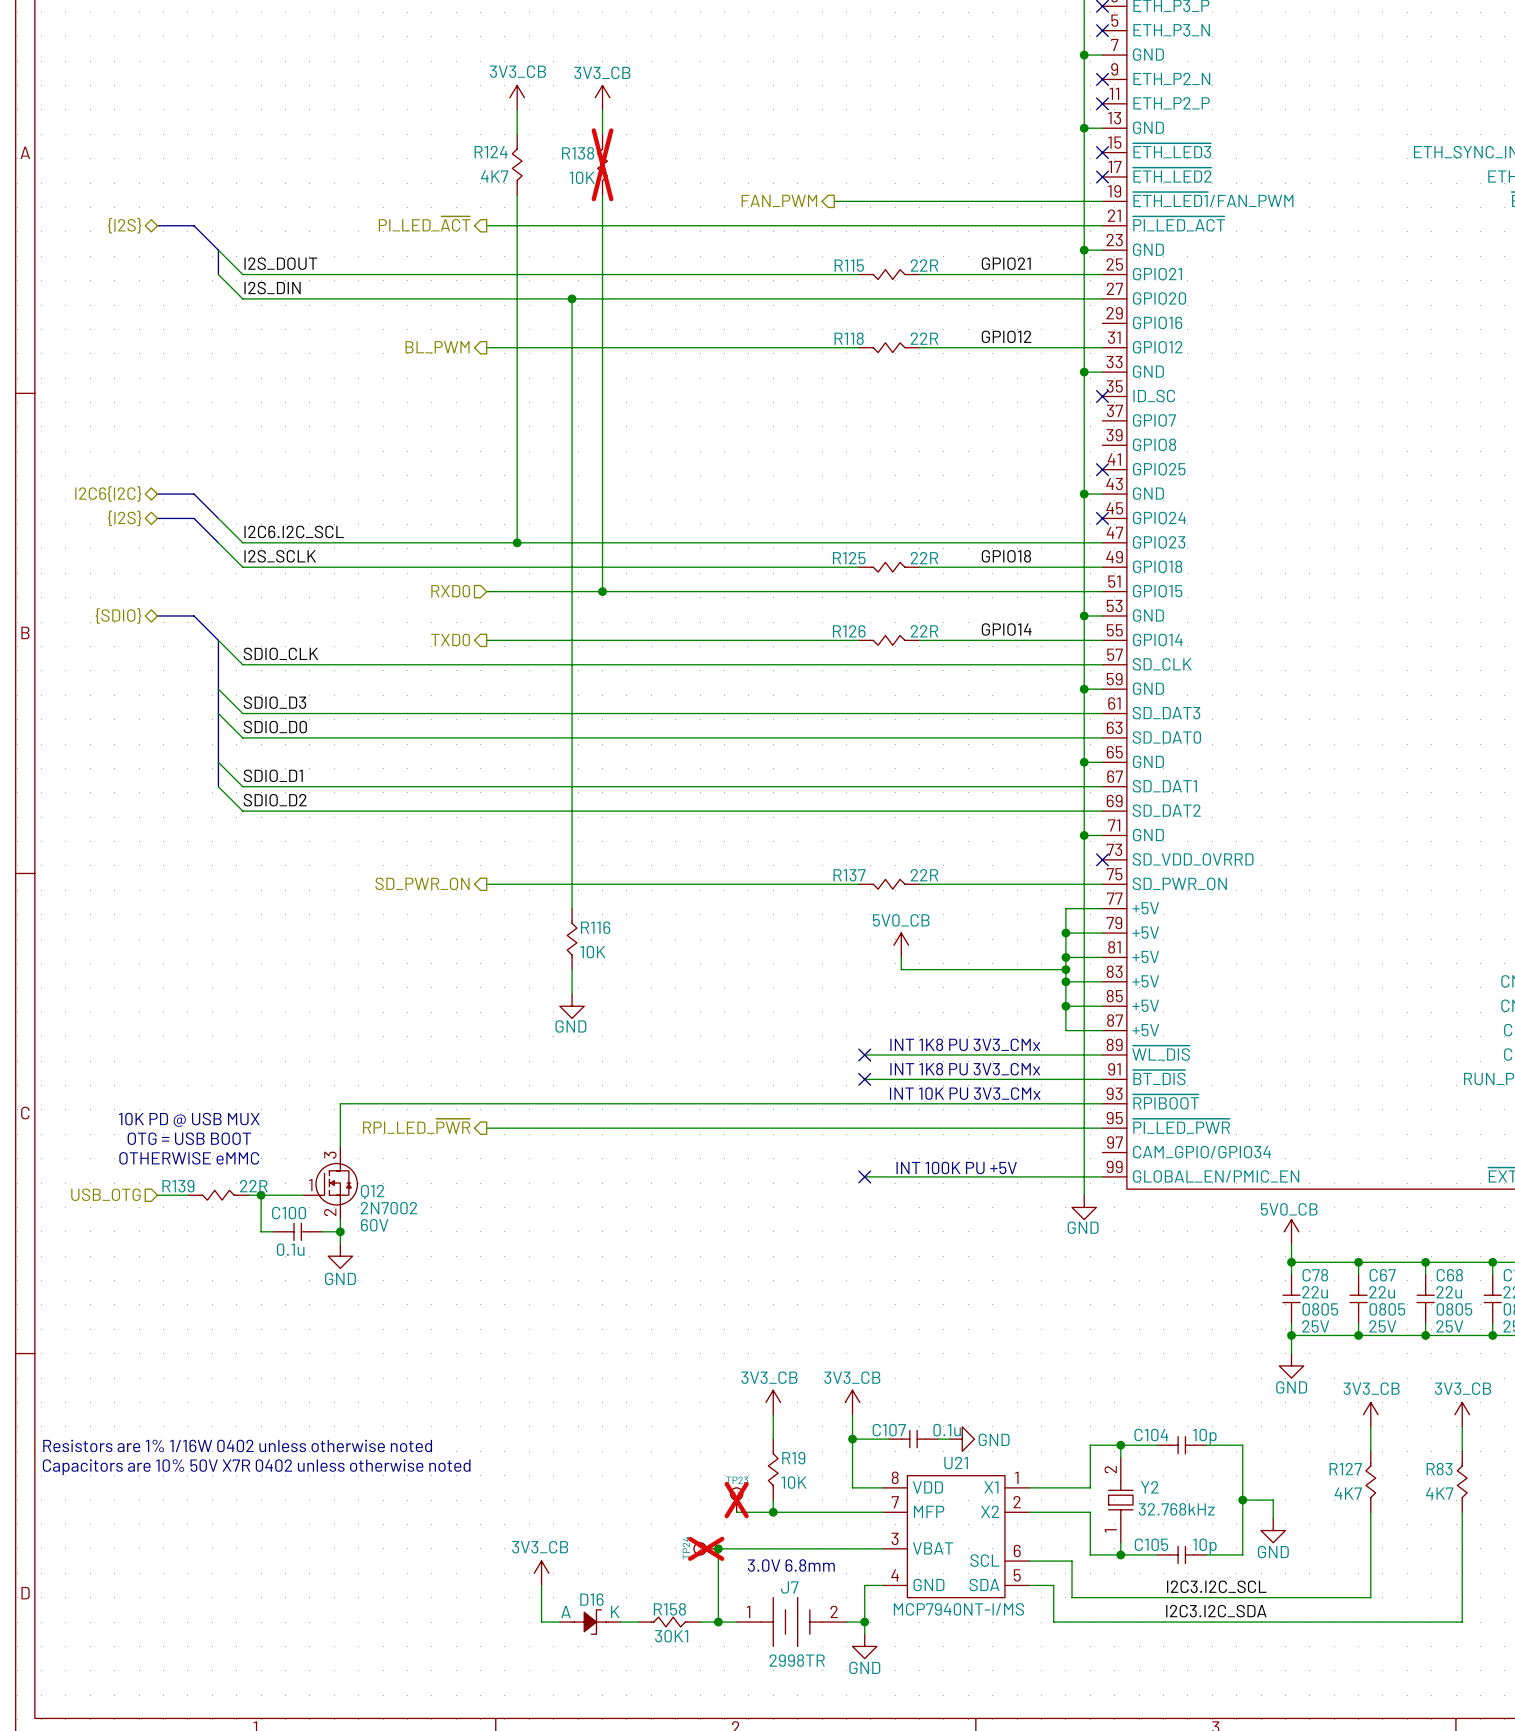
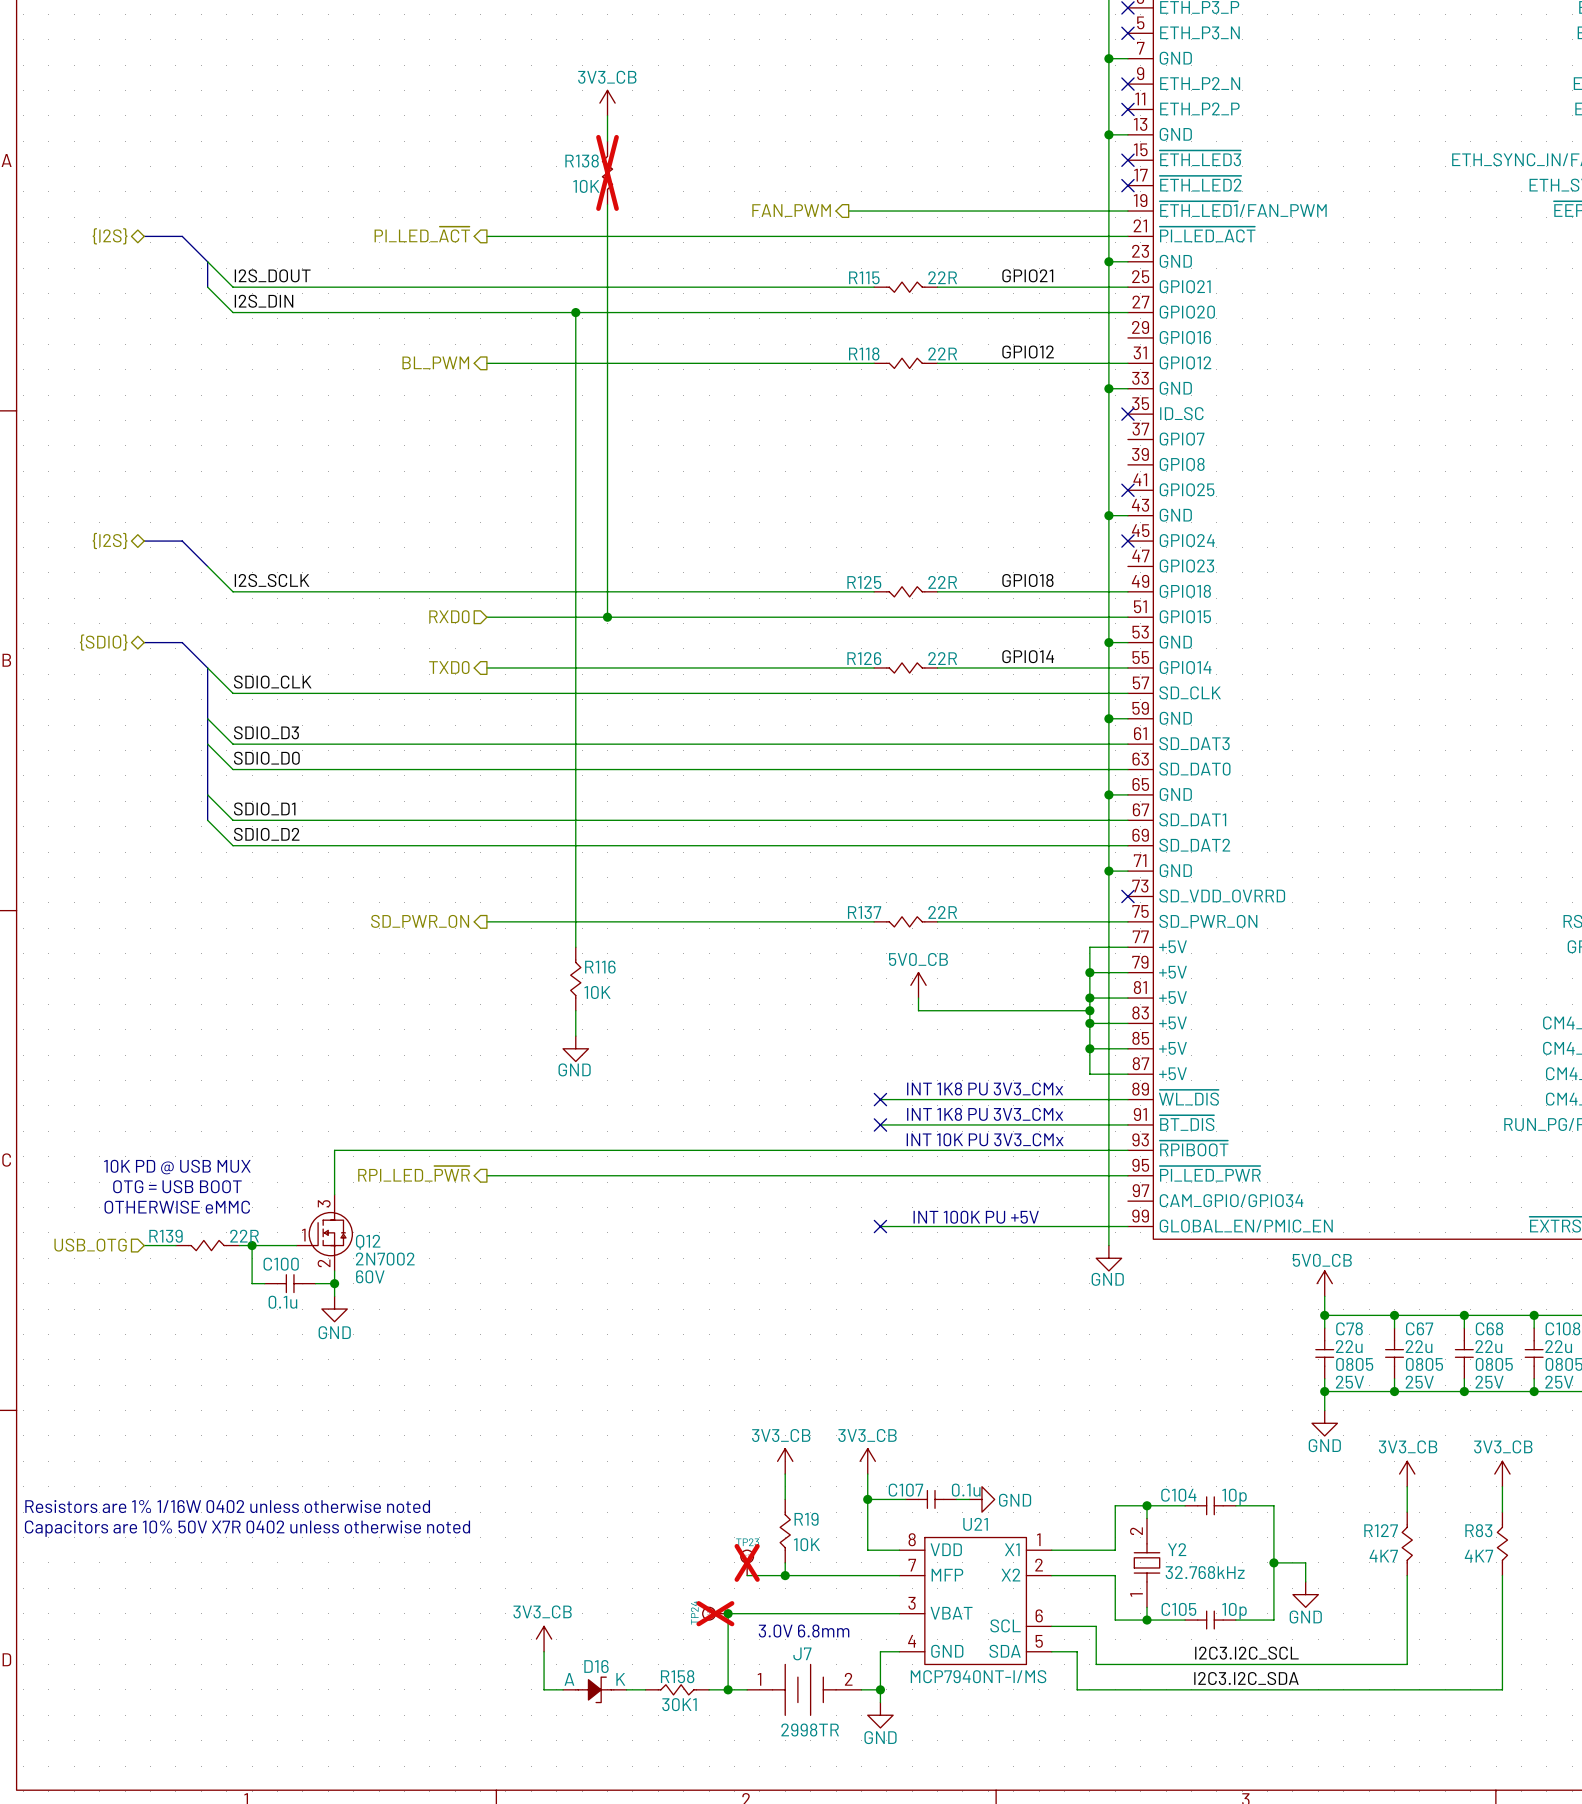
power symbol: 3V3_CB (517, 97) -> none
wire: (517, 109) (517, 134) -> none
R124: 4K7 (517, 164) -> none
wire: (517, 195) (517, 542) -> none
hierarchical label: I2C6{I2C} (108, 494) -> none
bus: (157, 494) (194, 494) (218, 518) -> none
wire: (218, 518) (242, 542) -> none
label: I2C6.I2C_SCL (294, 531) -> none
wire: (242, 542) (1102, 542) -> none
junction: (517, 542) -> none

